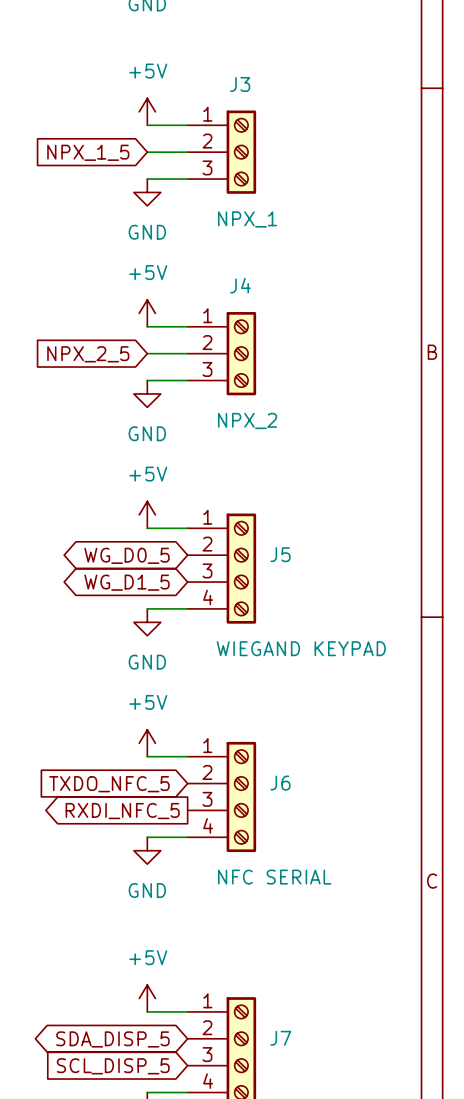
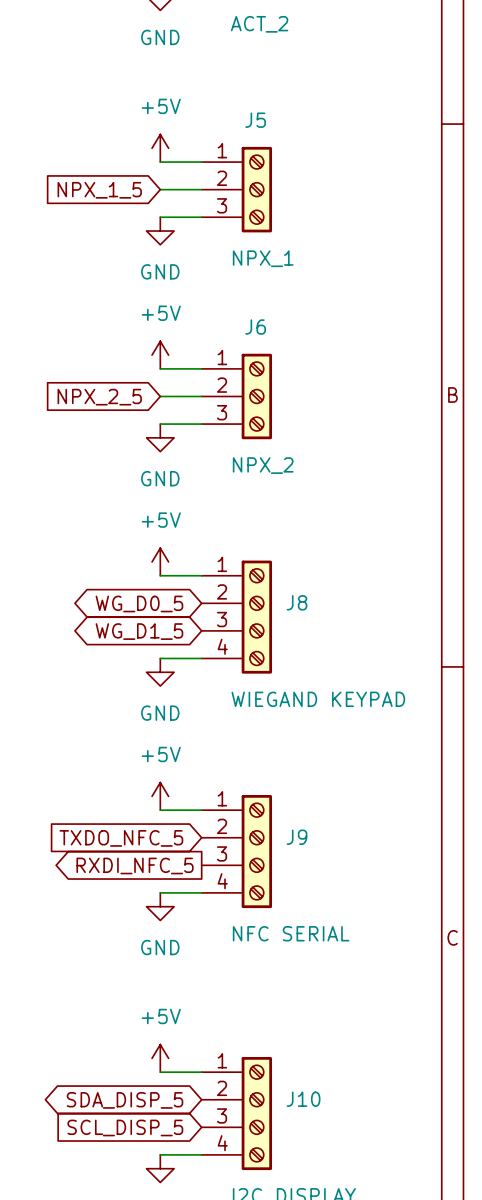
J3 name: J3 (240, 84) -> J5 (255, 120)
J4 name: J4 (240, 285) -> J6 (255, 327)
J5 name: J5 (280, 554) -> J8 (297, 602)
J6 name: J6 (280, 783) -> J9 (297, 837)
J7 name: J7 (280, 1038) -> J10 (303, 1099)

